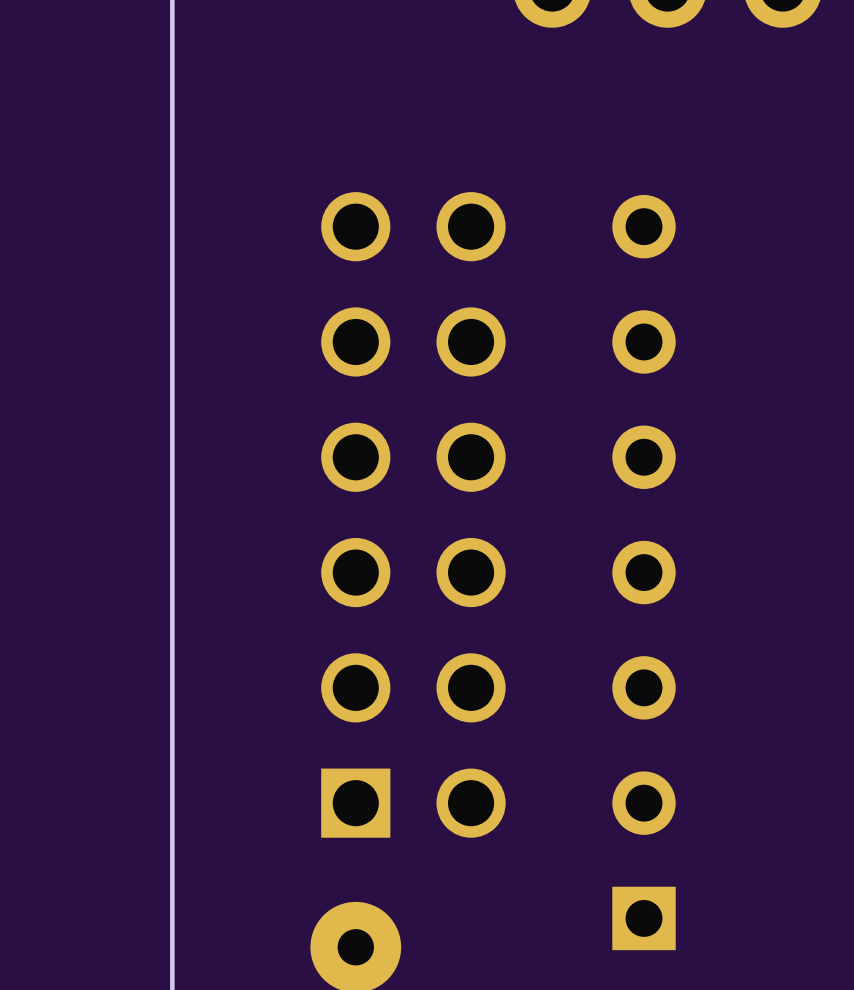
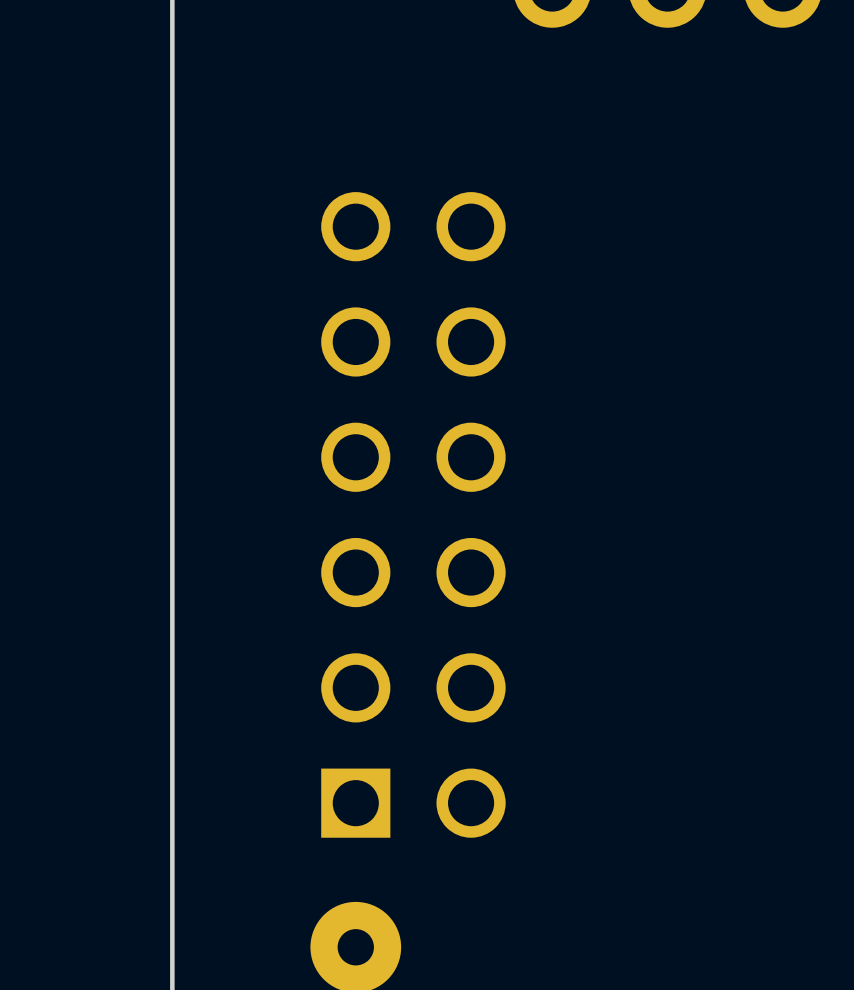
part: (644, 572) -> none

